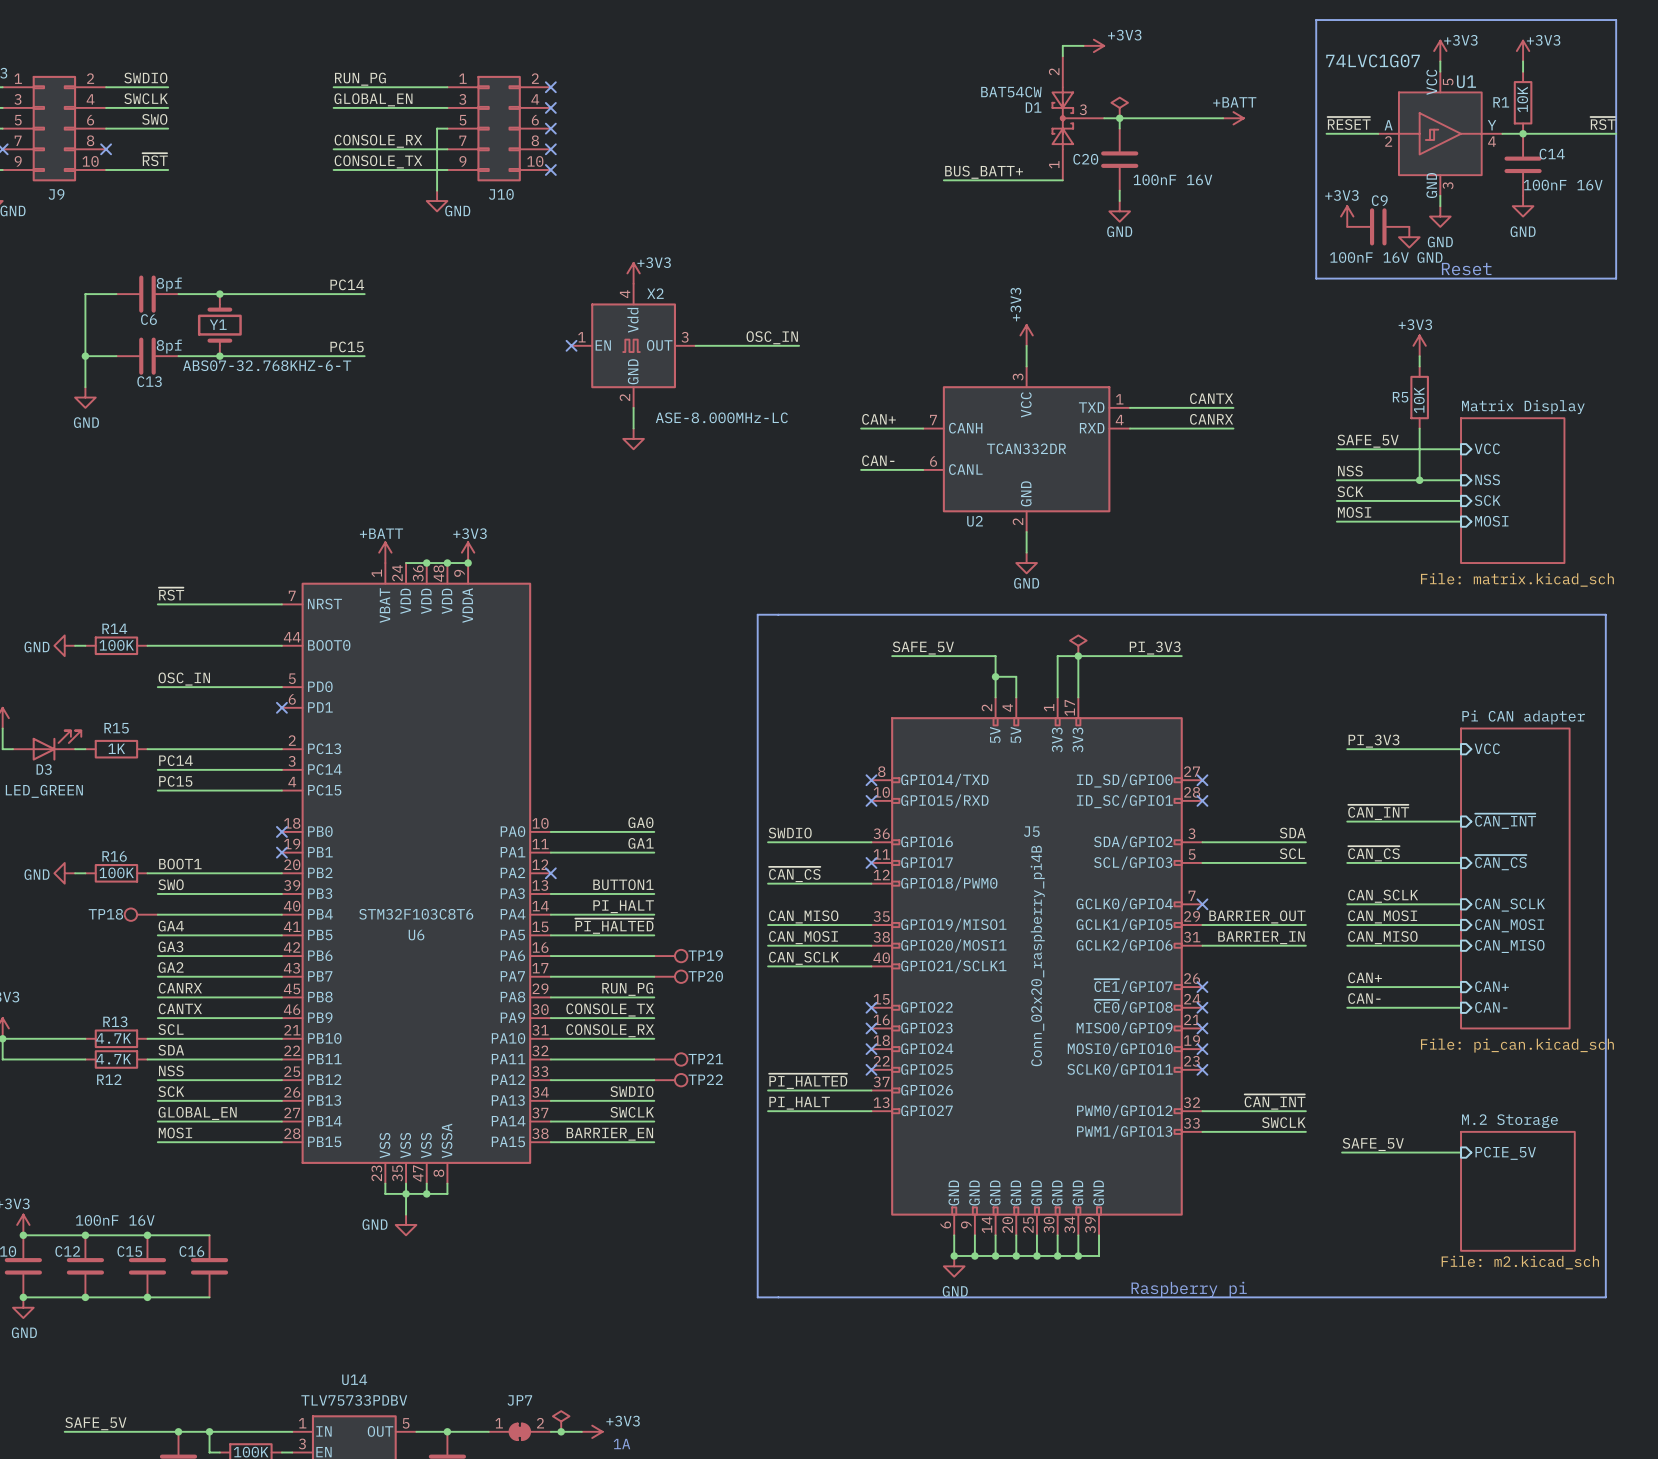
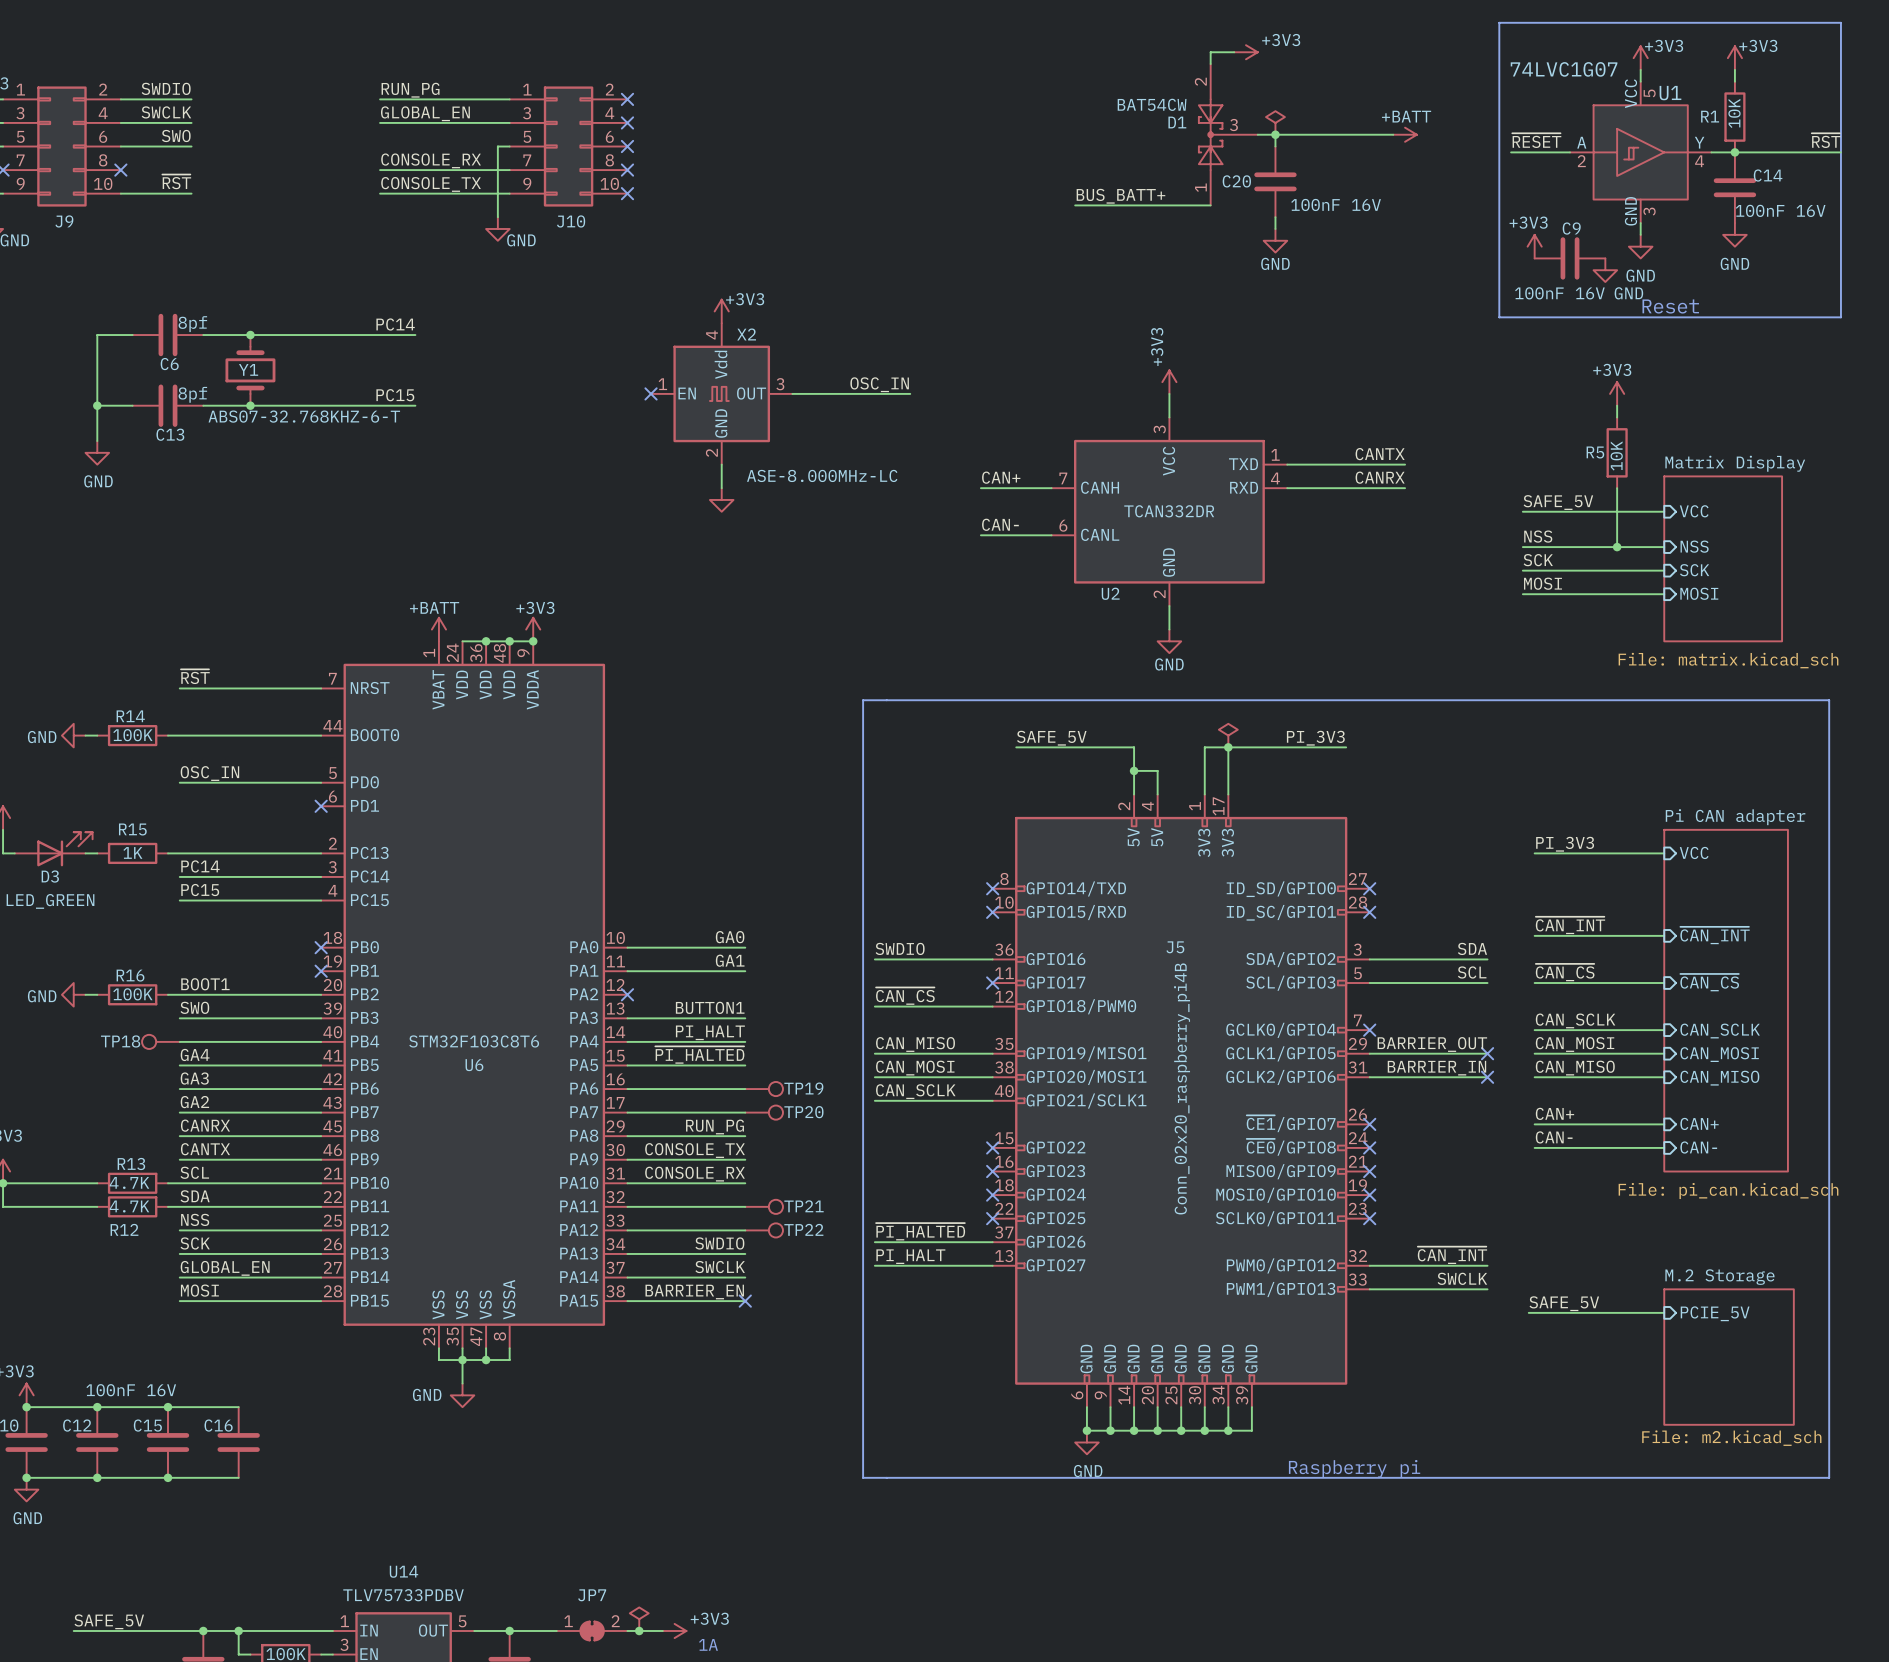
no-connect mark: none -> (1487, 1053)
no-connect mark: none -> (1487, 1077)
no-connect mark: none -> (745, 1301)

